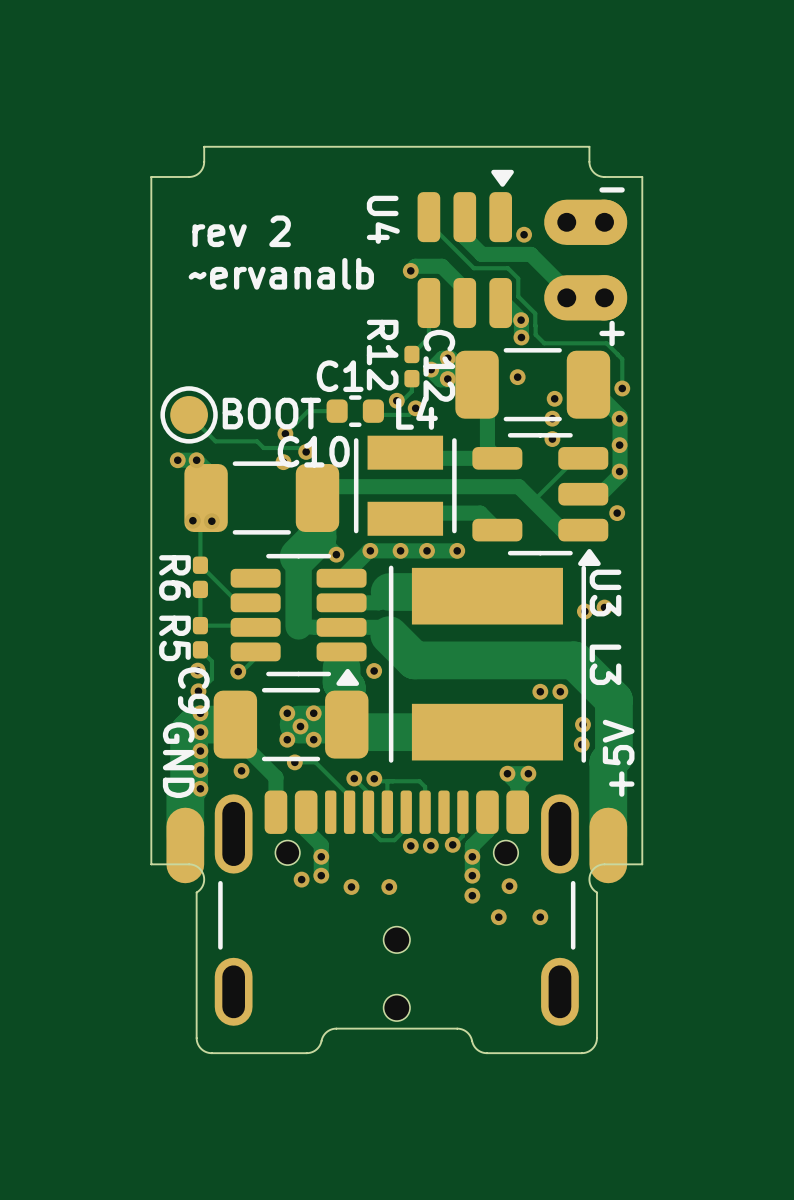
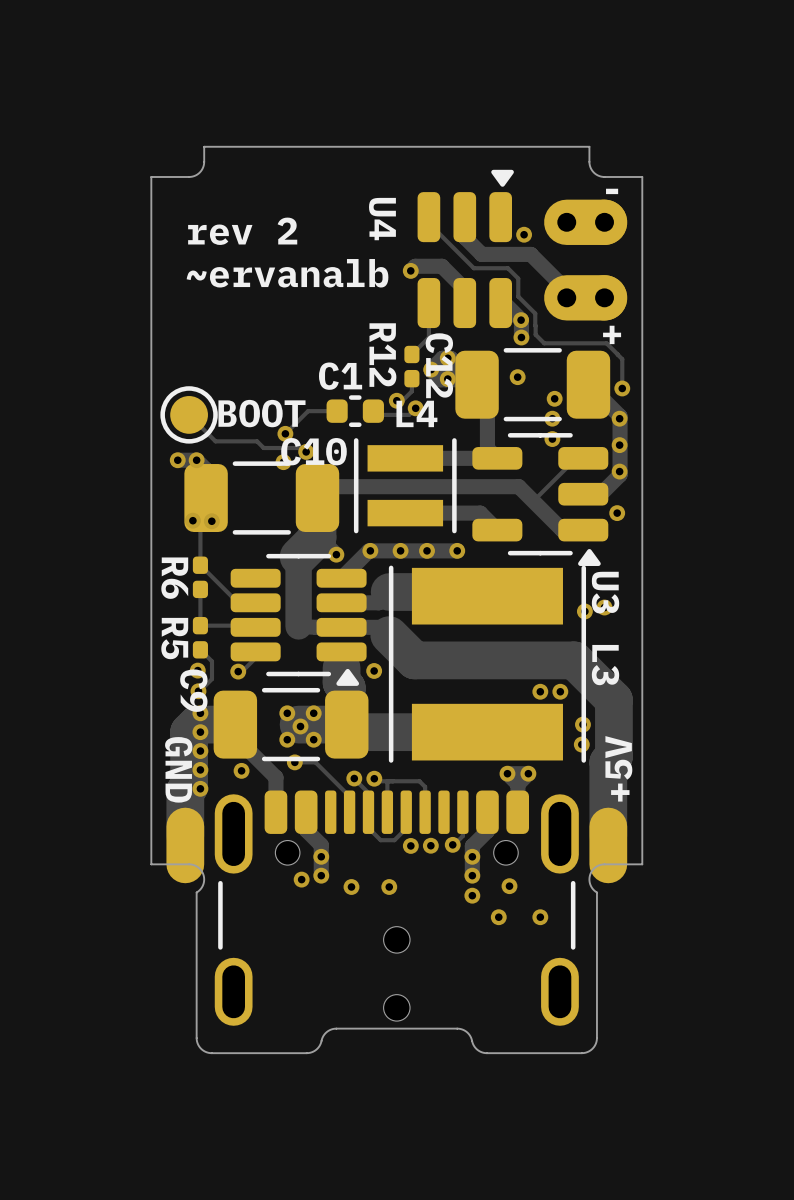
L4 footprint: [353, 435, 457, 536] -> [353, 438, 457, 534]

